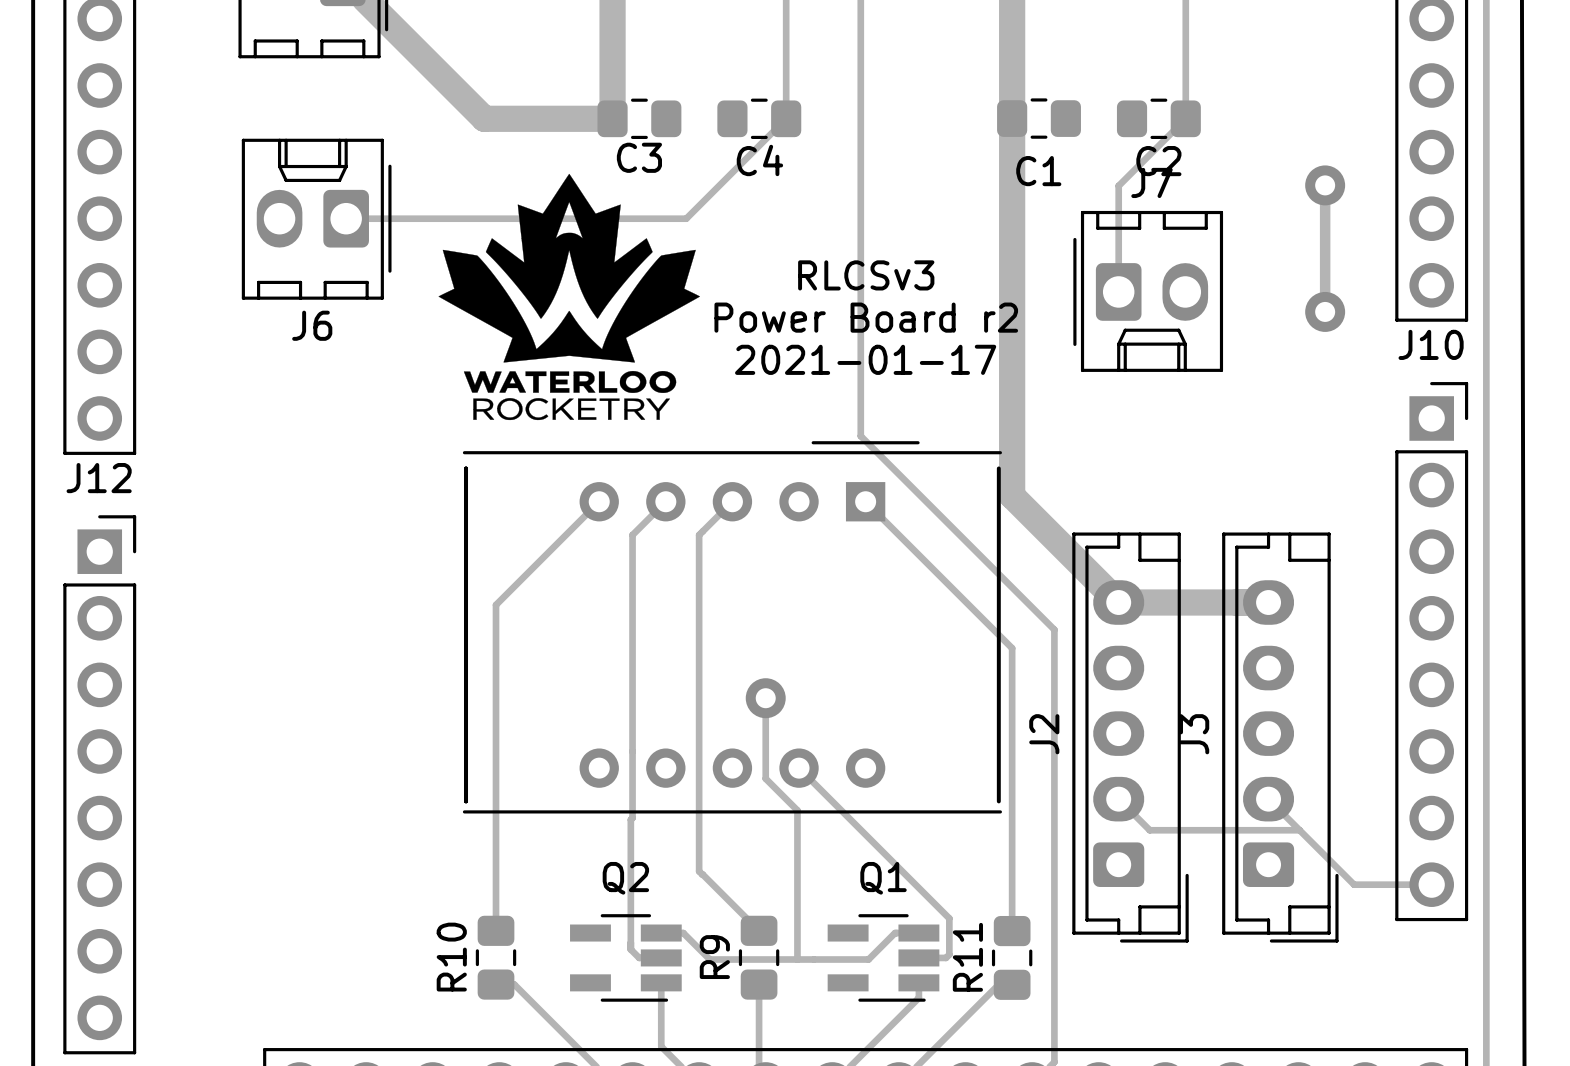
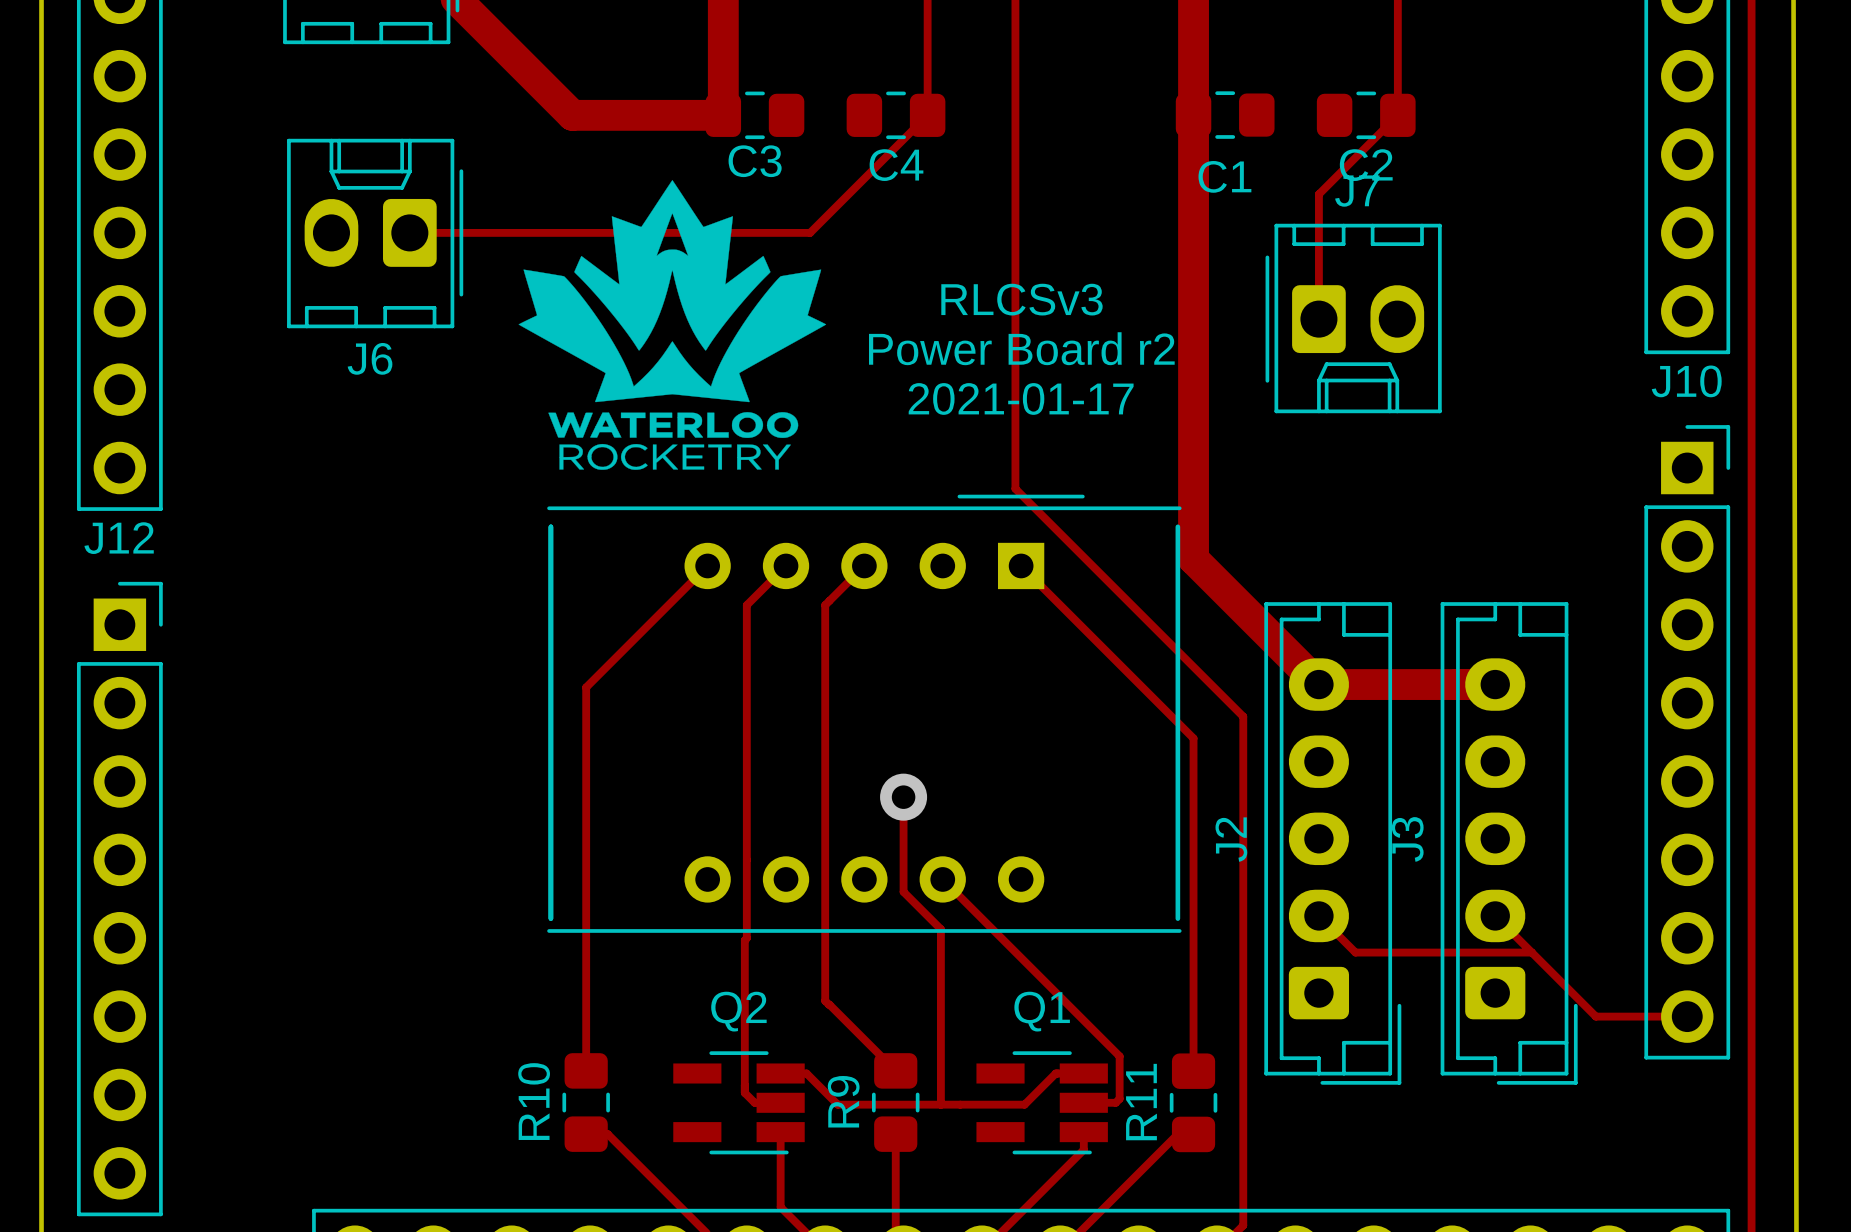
track: (1325, 185) (1325, 311) -> none
via: (1325, 185) -> none
via: (1325, 311) -> none

